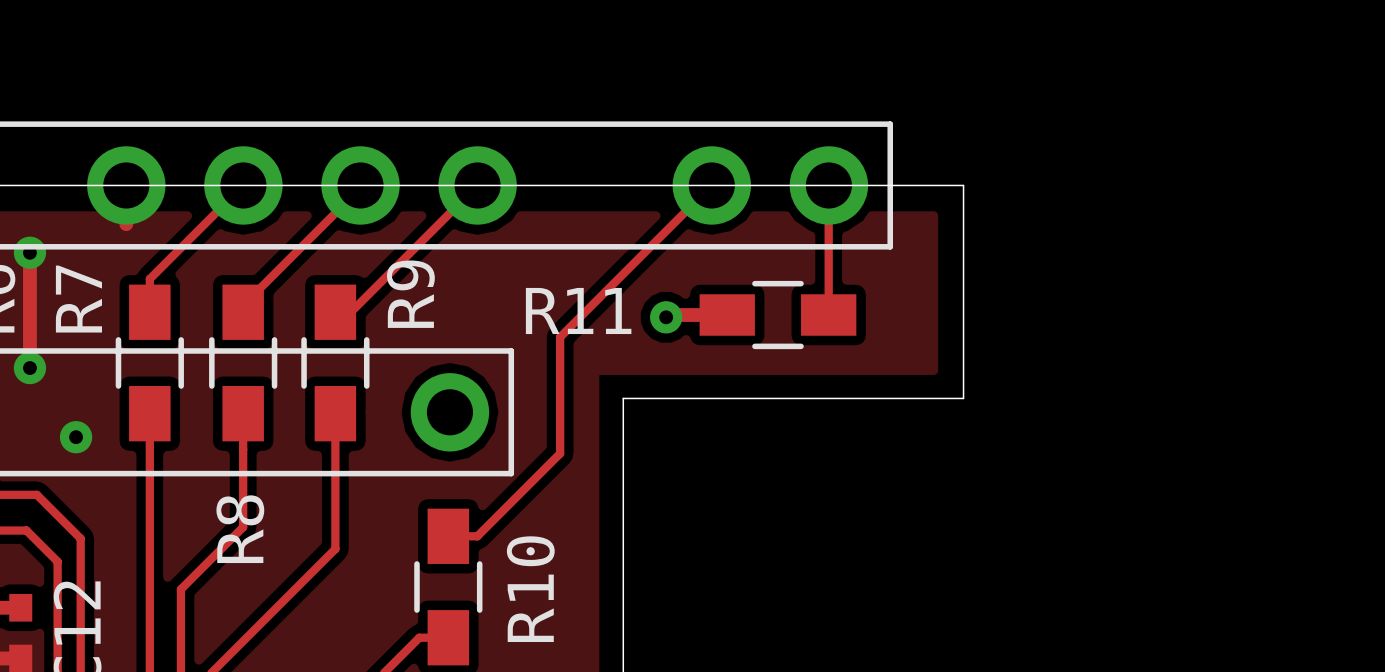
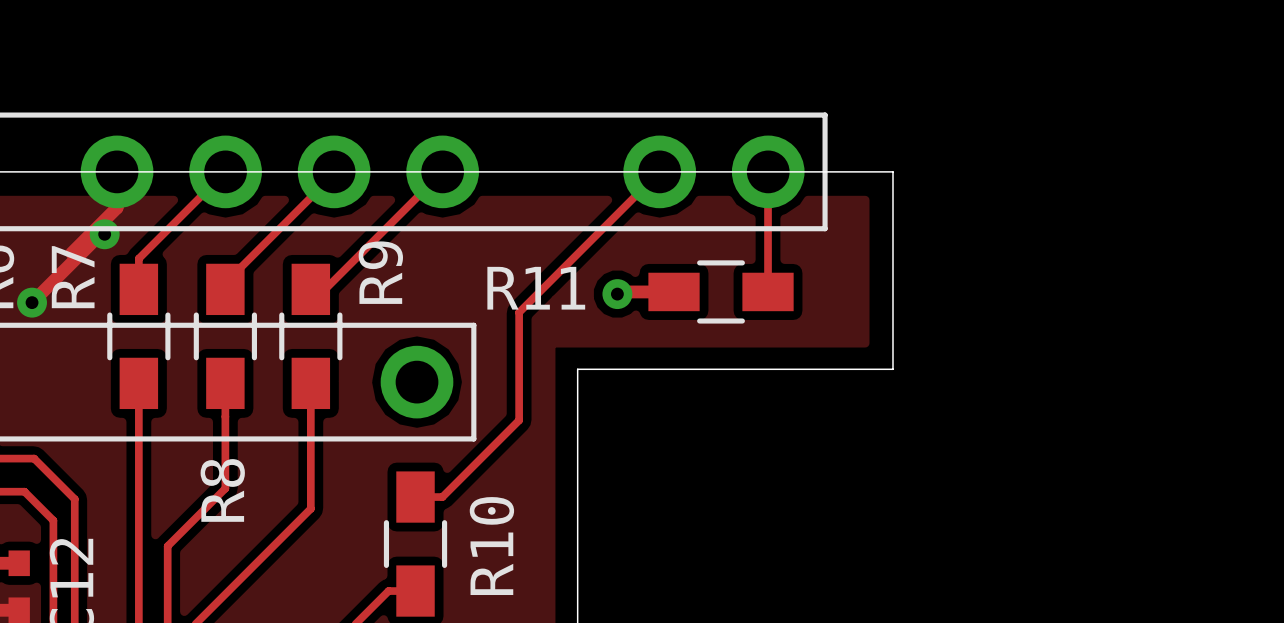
track: none -> (117, 207) (71, 253)
track: (29, 252) (29, 368) -> none
via: (29, 252) -> none
track: none -> (104, 234) (100, 234) (32, 302)
via: none -> (104, 234)
via: none -> (32, 302)
via: (29, 368) -> none
via: (76, 437) -> none

